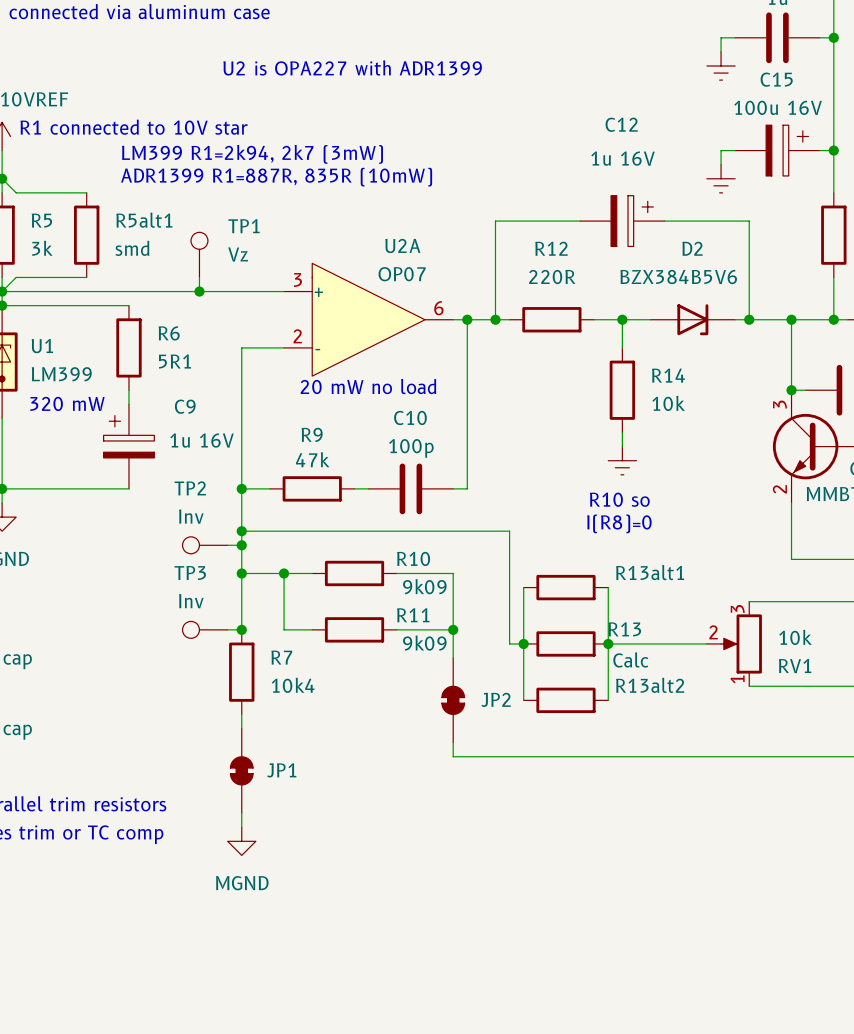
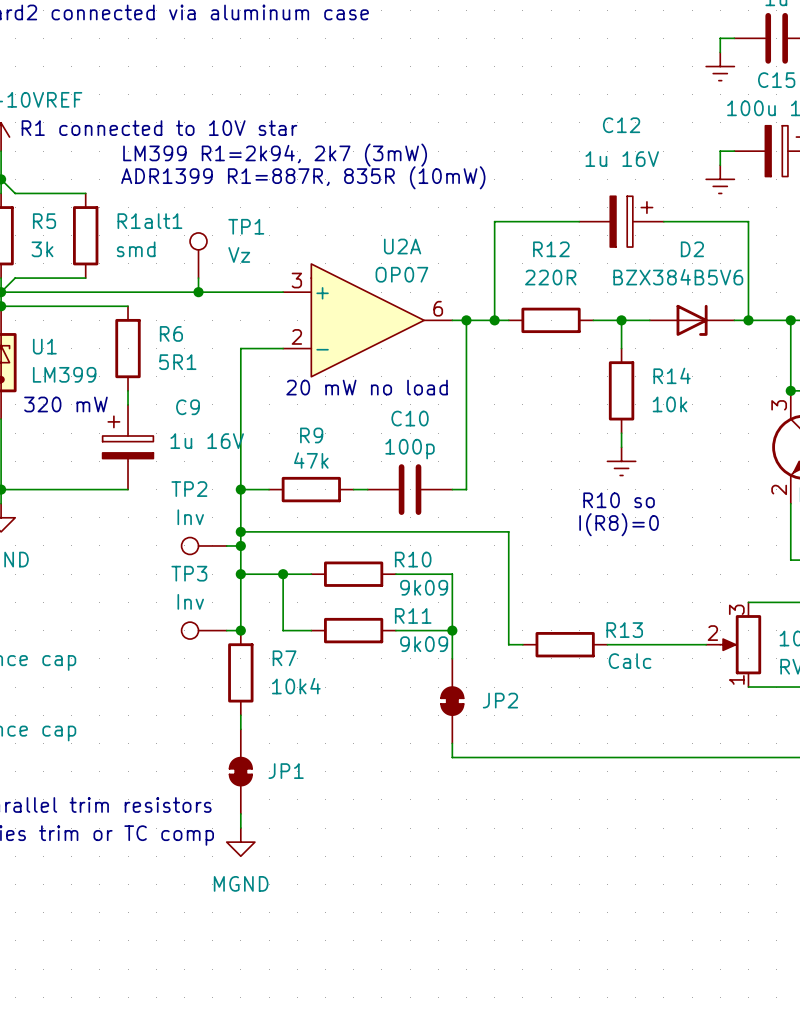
text: U2 is OPA227 with ADR1399 (352, 67) -> none
R5alt1 name: R5alt1 (144, 220) -> R1alt1 (149, 221)
wire: (523, 587) (523, 700) -> none
R13alt1: (565, 587) -> none
wire: (608, 587) (608, 700) -> none
junction: (523, 643) -> none
junction: (608, 643) -> none
R13alt2: (565, 700) -> none

